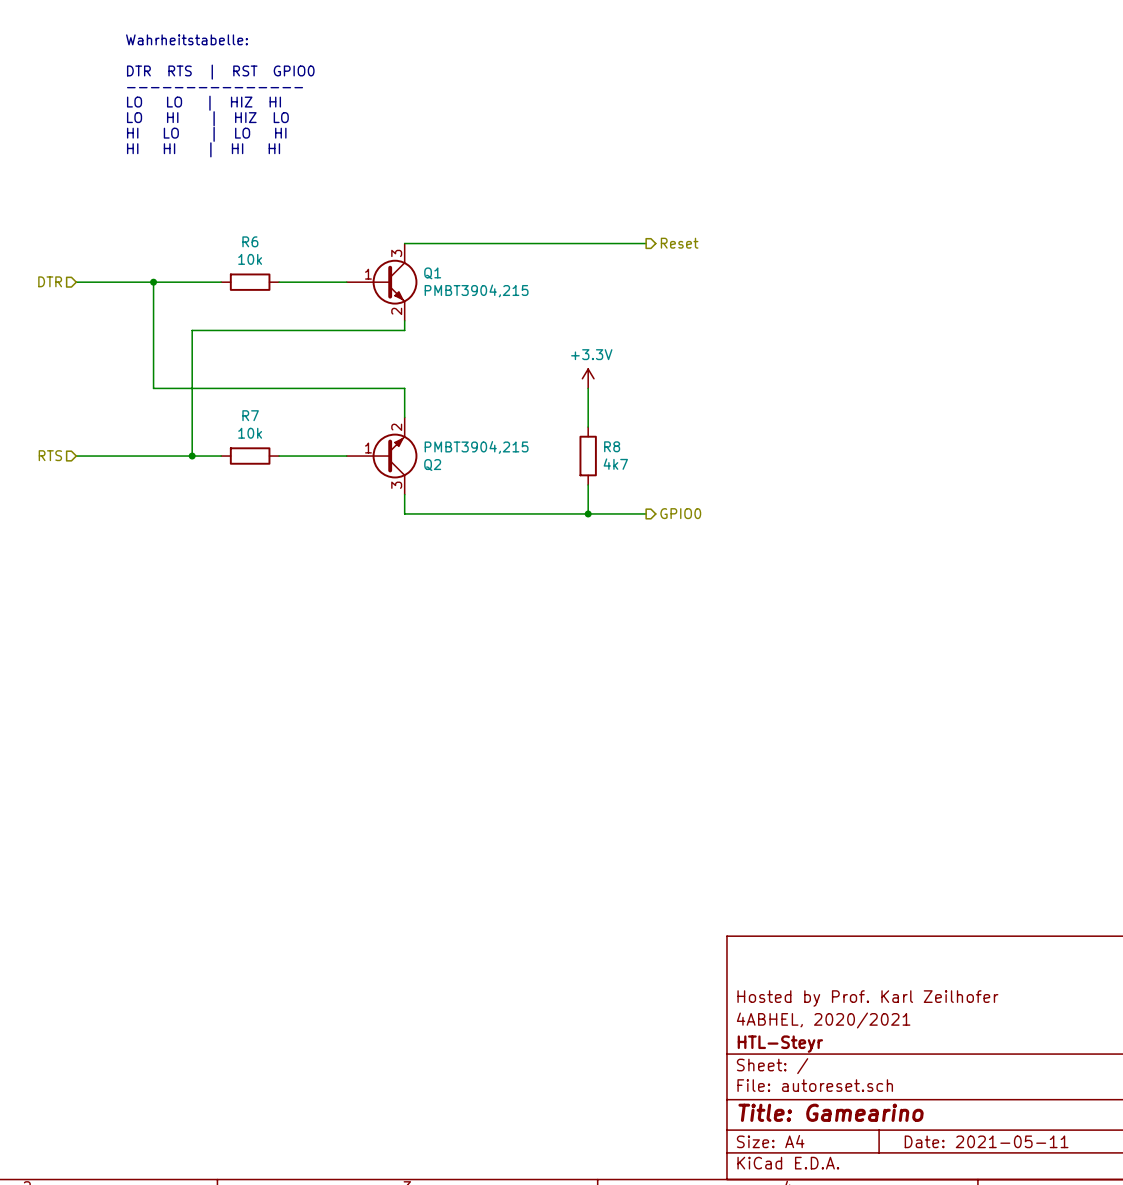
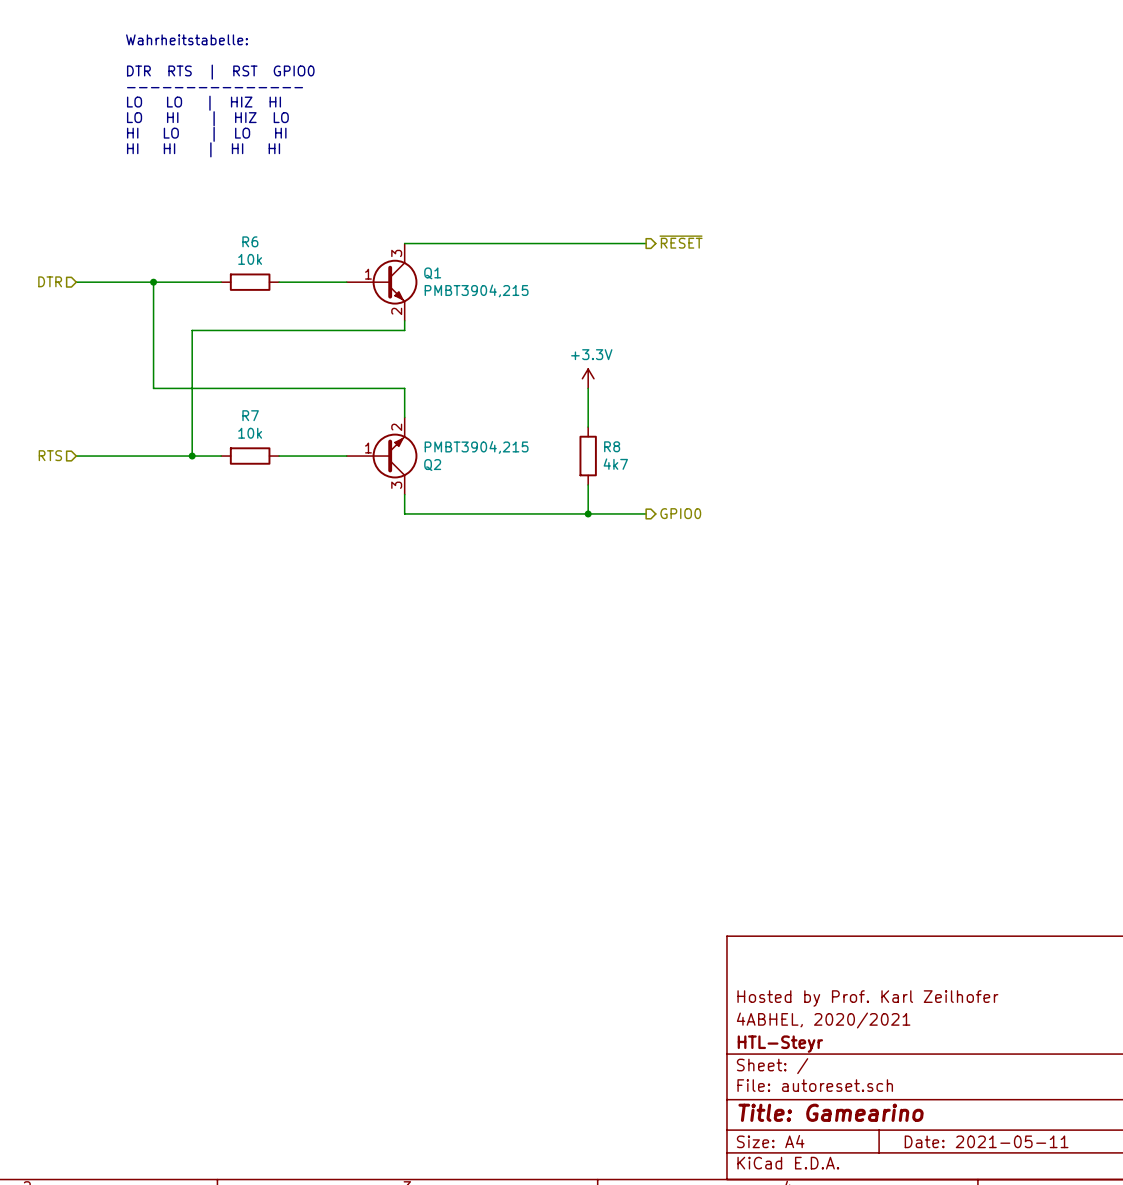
hierarchical label: Reset (679, 243) -> ~{RESET} (681, 242)

